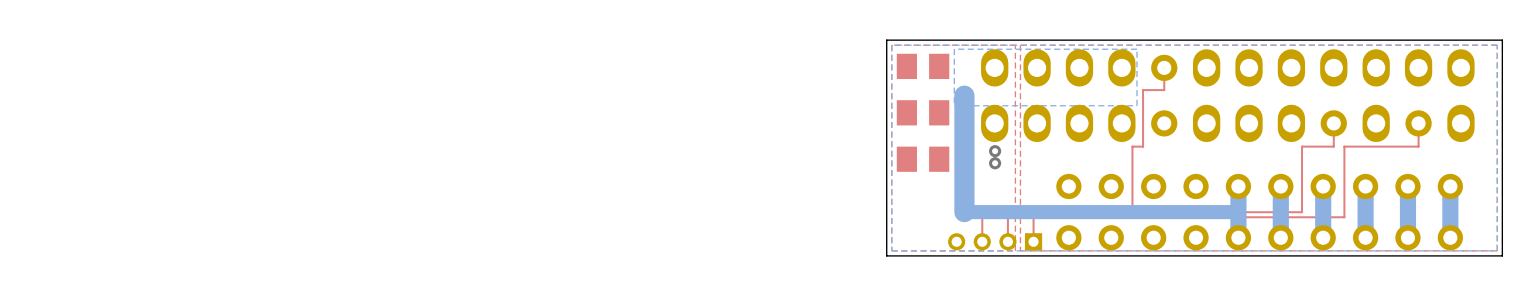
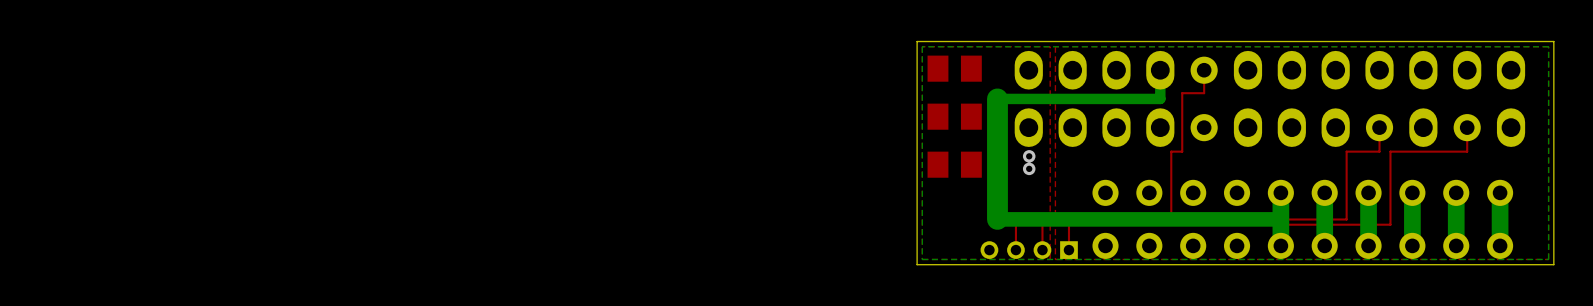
bottom zone outline: (1137, 49) (954, 49) (954, 105) (1137, 105) (1137, 49) -> none
bottom track: none -> (1160, 70) (1160, 98) (997, 98)

